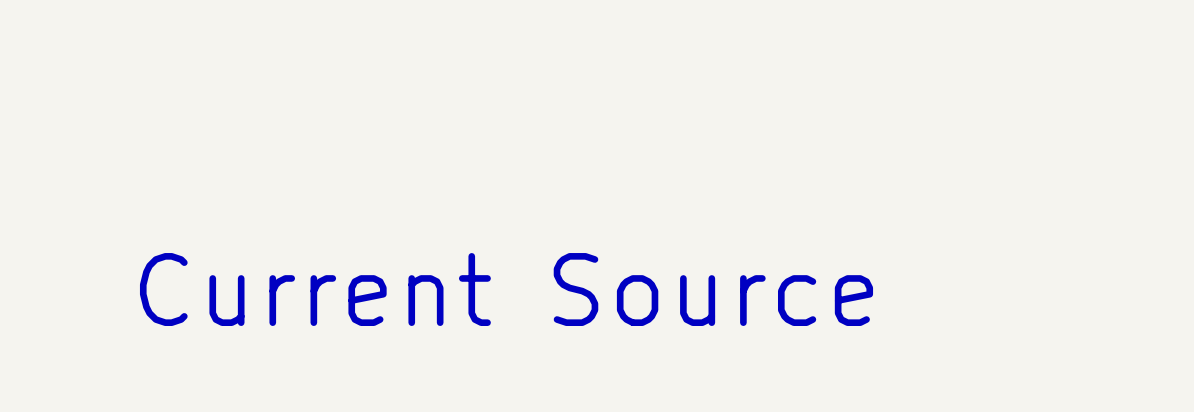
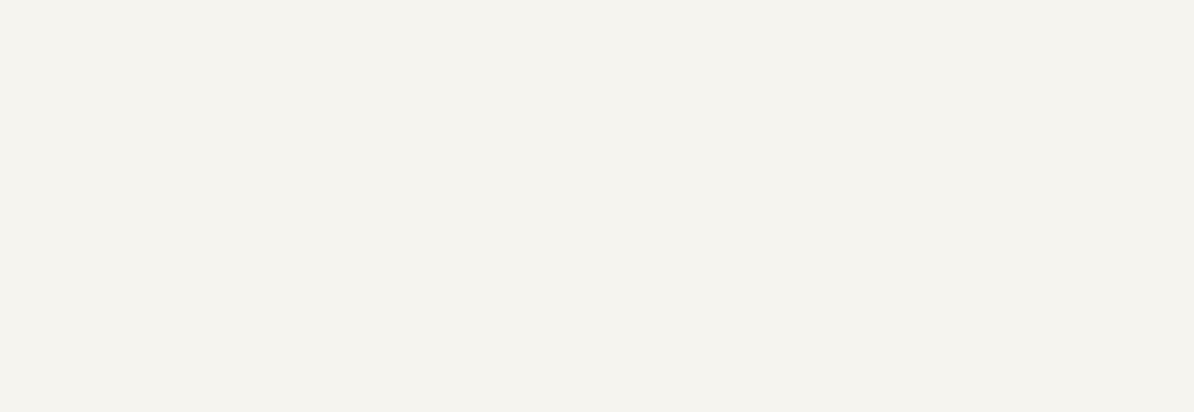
text: Current Source (506, 289) -> none

